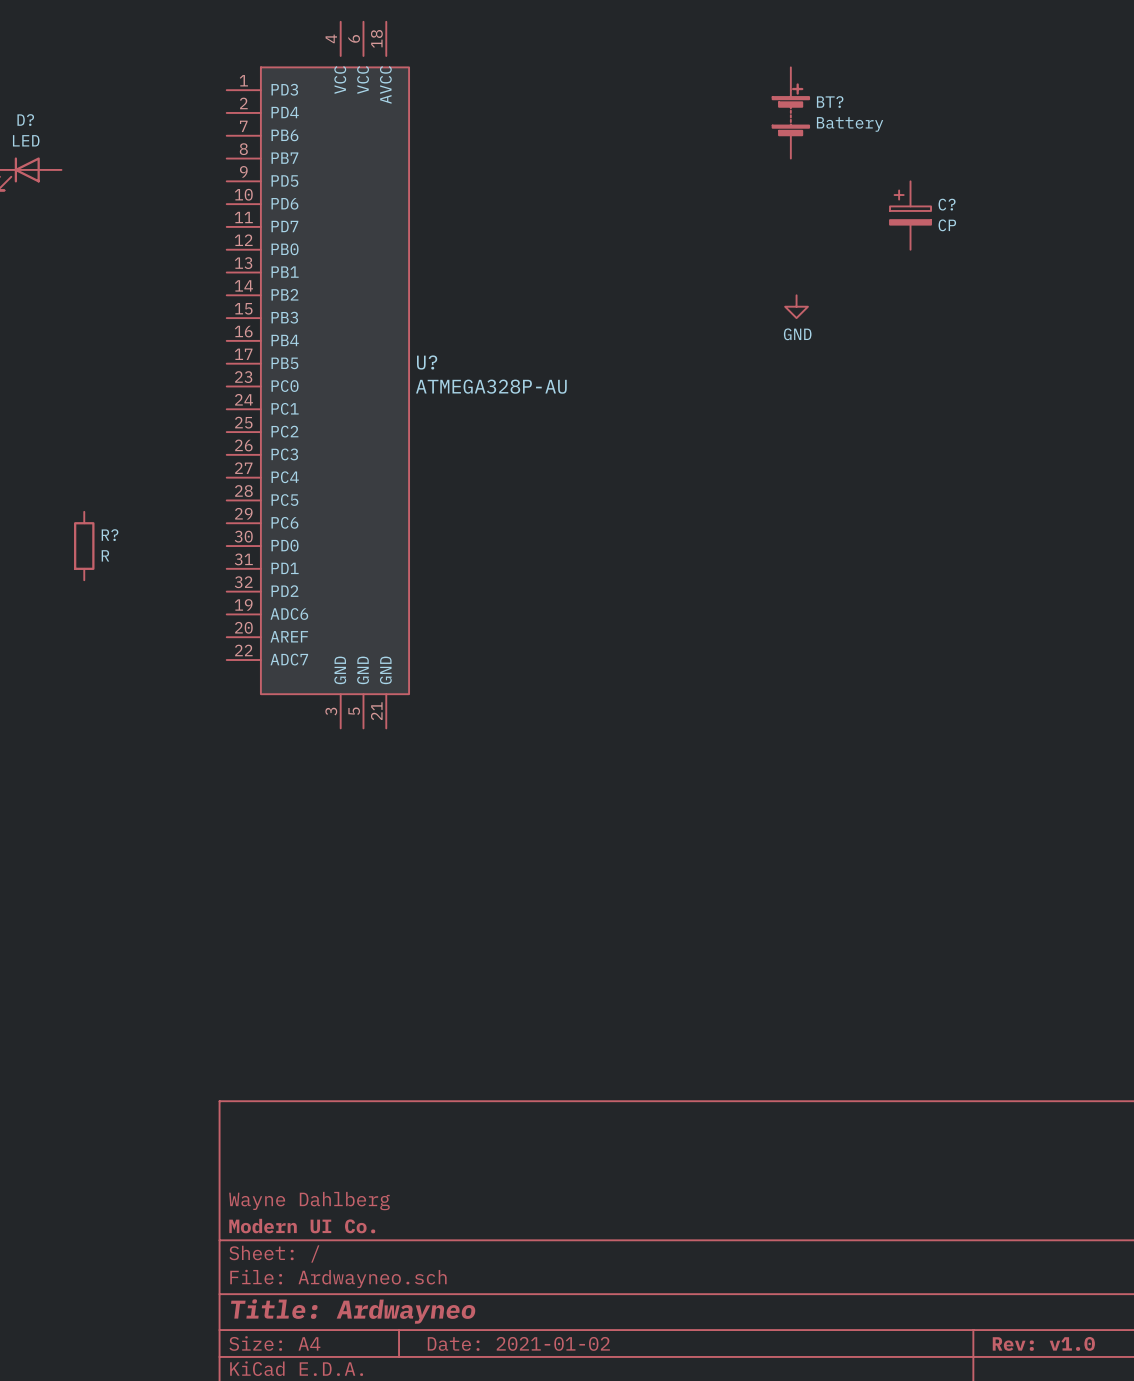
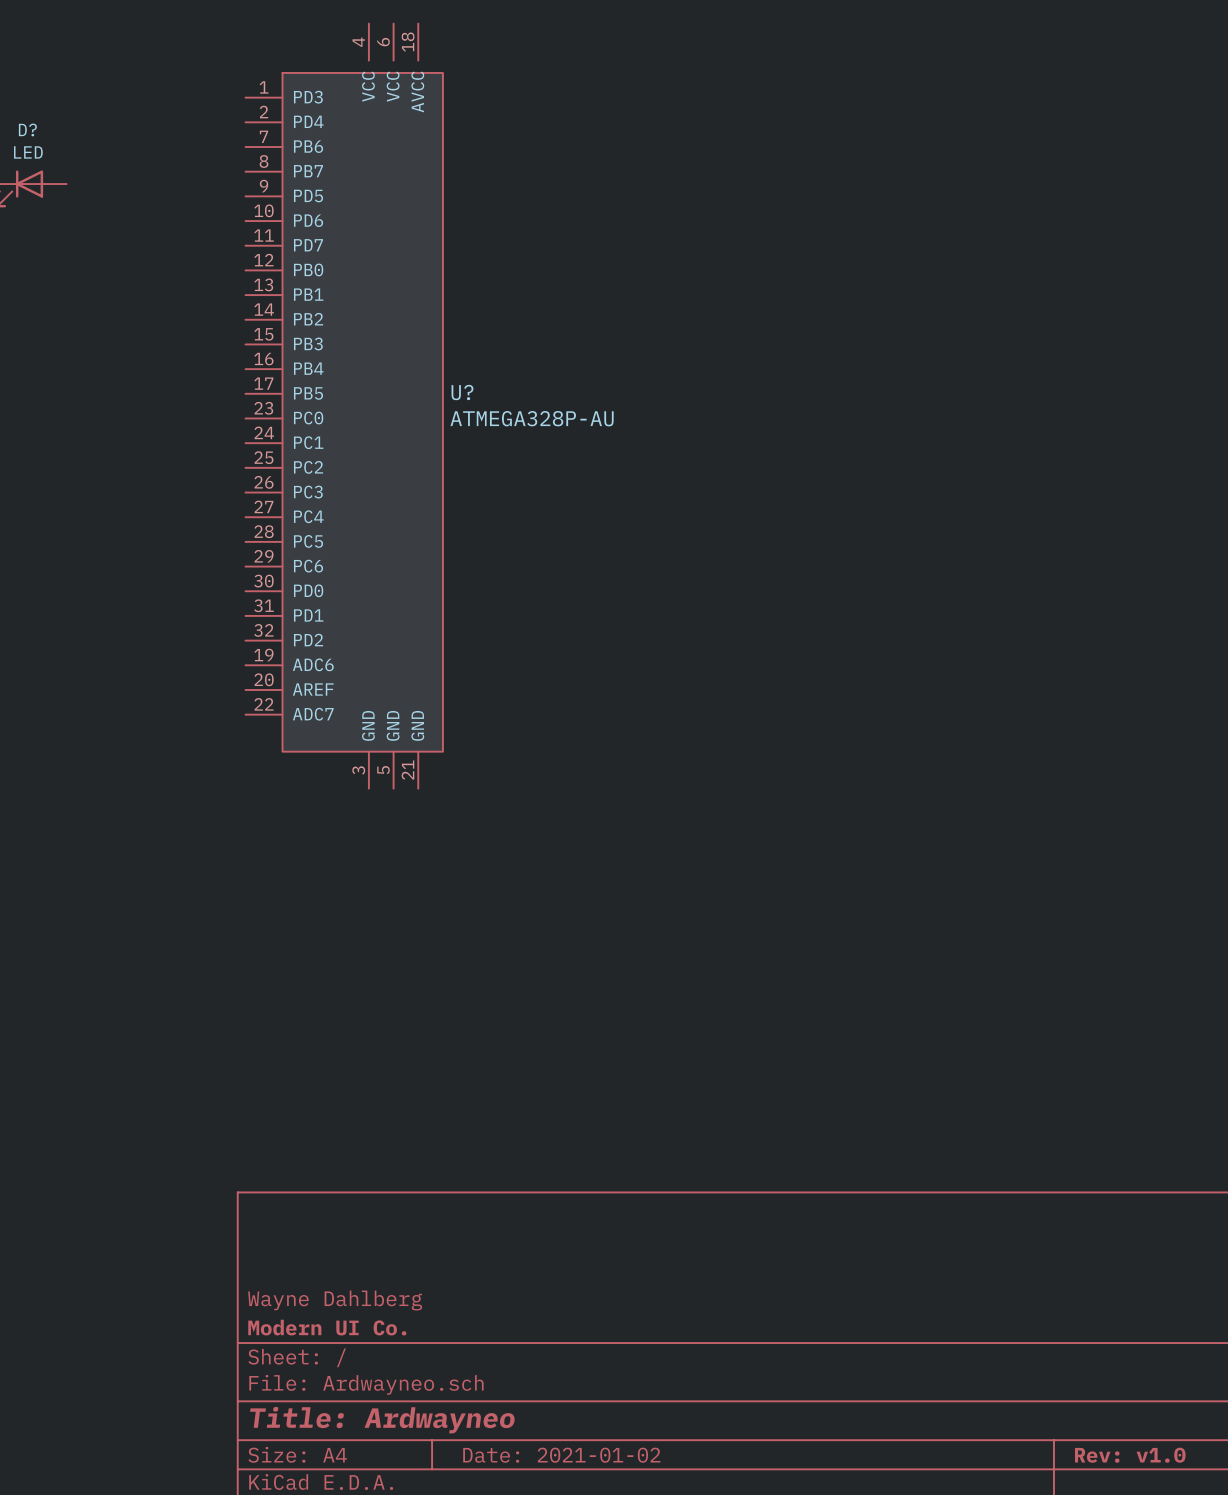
BT?: Battery (790, 112) -> none
C?: CP (910, 215) -> none
power symbol: GND (796, 306) -> none
R?: R (84, 546) -> none

